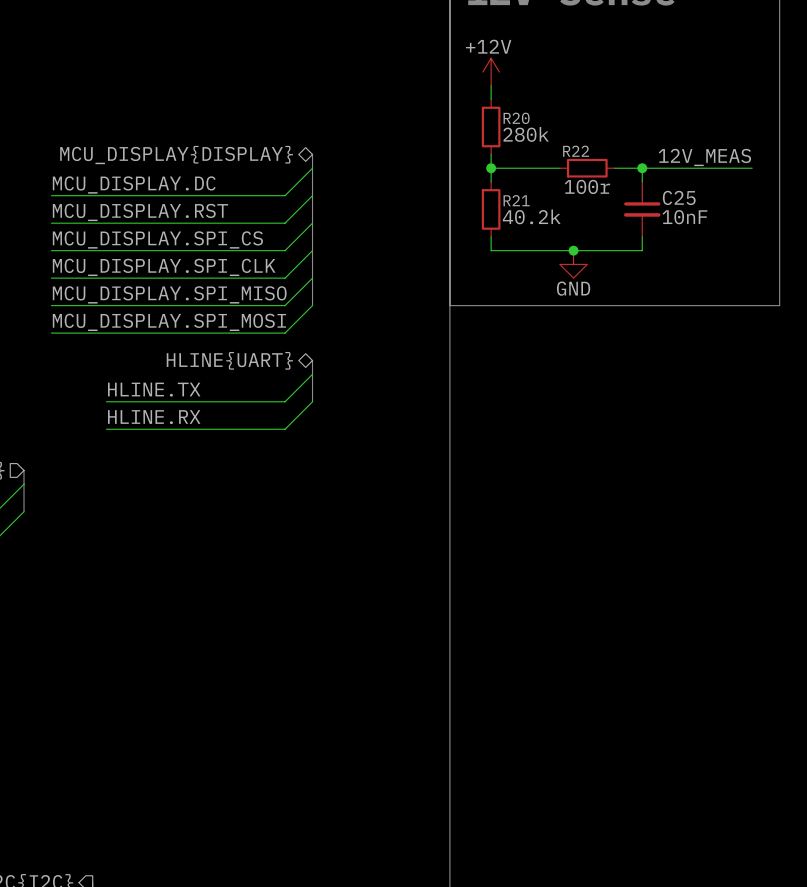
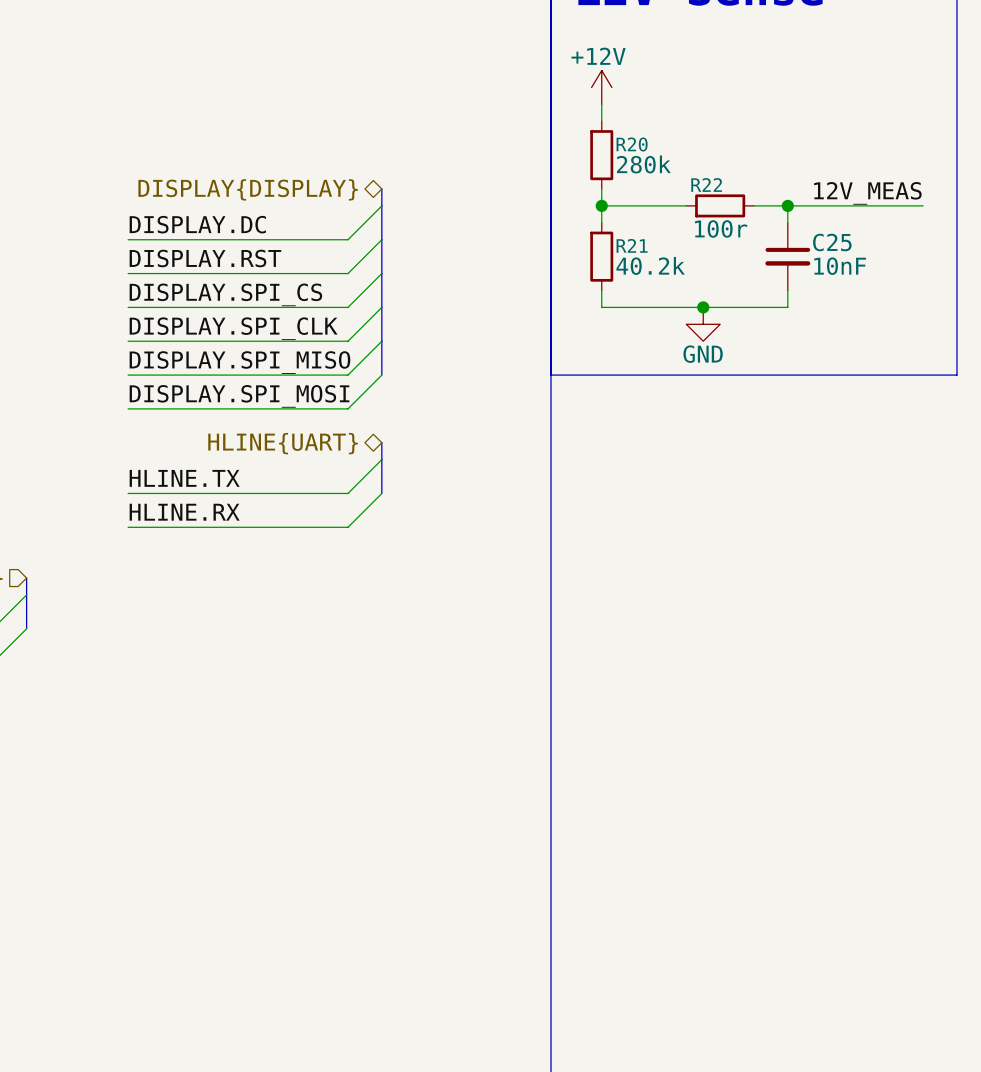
hierarchical label: MCU_DISPLAY{DISPLAY} (176, 155) -> DISPLAY{DISPLAY} (248, 189)
label: none -> DISPLAY.DC (197, 224)
label: MCU_DISPLAY.DC (134, 184) -> none
wire: (51, 195) (106, 195) -> none
label: none -> DISPLAY.RST (205, 258)
label: MCU_DISPLAY.RST (140, 212) -> none
wire: (51, 223) (106, 223) -> none
label: MCU_DISPLAY.SPI_CS (157, 239) -> none
label: none -> DISPLAY.SPI_CS (225, 294)
wire: (51, 250) (106, 250) -> none
label: MCU_DISPLAY.SPI_CLK (164, 267) -> none
label: none -> DISPLAY.SPI_CLK (233, 328)
wire: (51, 278) (106, 278) -> none
label: MCU_DISPLAY.SPI_MISO (169, 294) -> none
label: none -> DISPLAY.SPI_MISO (239, 362)
wire: (51, 305) (106, 305) -> none
label: MCU_DISPLAY.SPI_MOSI (169, 322) -> none
label: none -> DISPLAY.SPI_MOSI (239, 396)
wire: (51, 333) (106, 333) -> none

